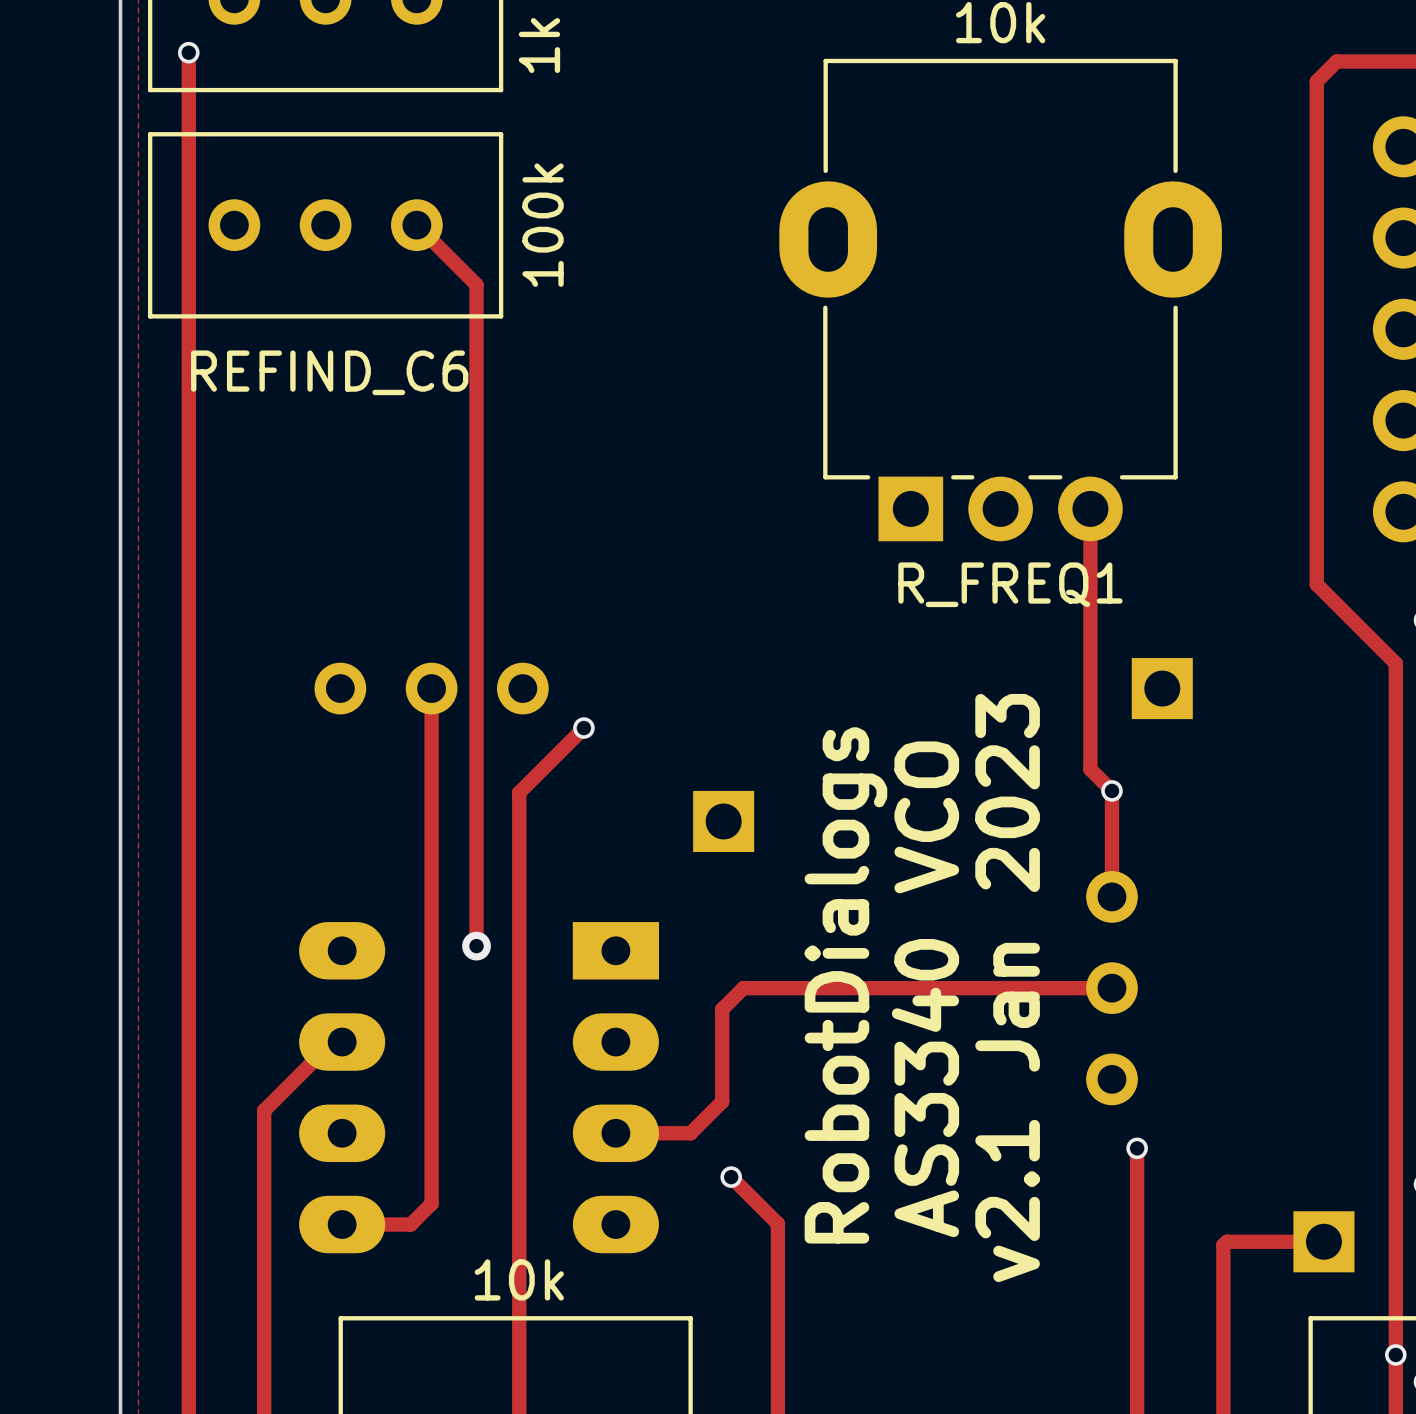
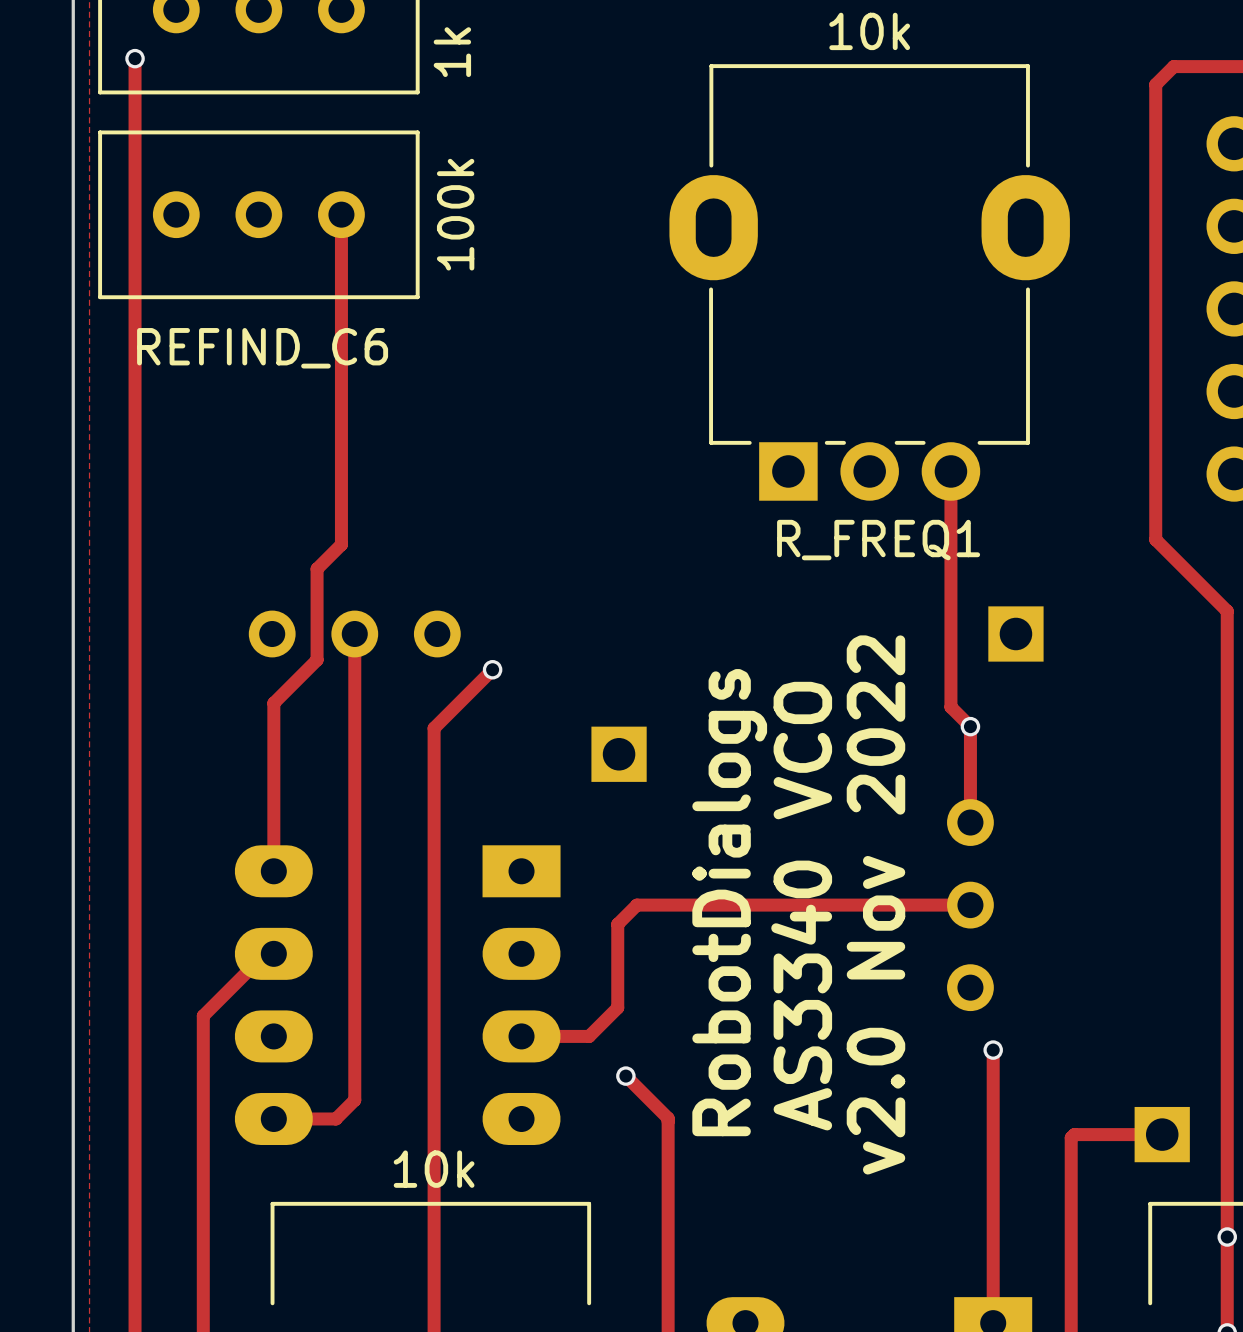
track: (416, 225) (476, 284) (476, 946) -> (341, 214) (341, 544) (317, 568) (317, 660) (273, 703) (273, 871)
via: (476, 946) -> none
text: v2.1 Jan 2023 (1007, 988) -> v2.0 Nov 2022 (875, 904)

